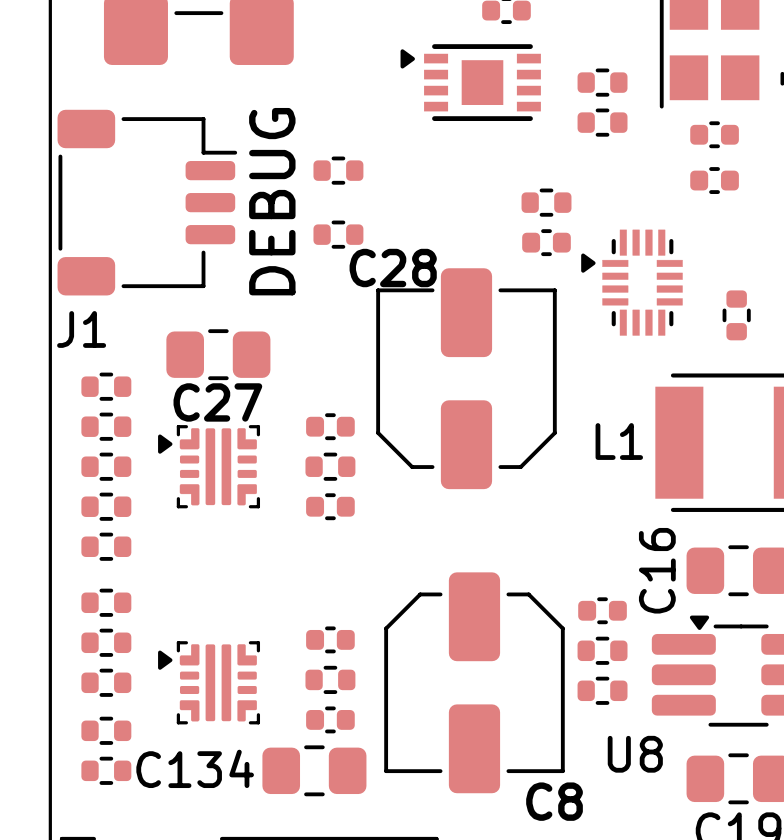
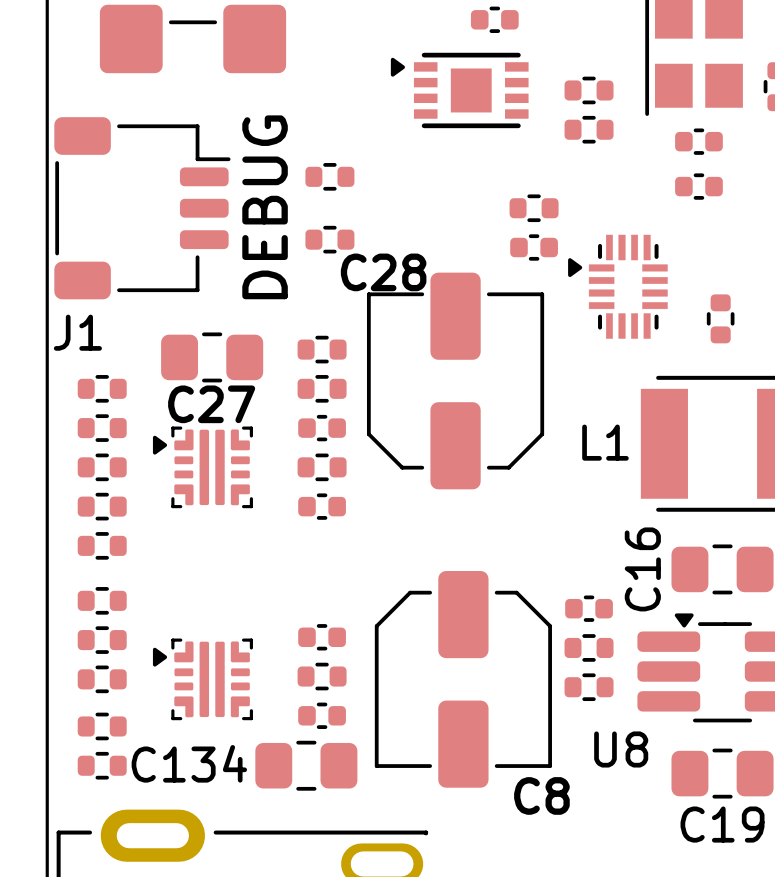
part: none -> (322, 349)
part: none -> (322, 388)

